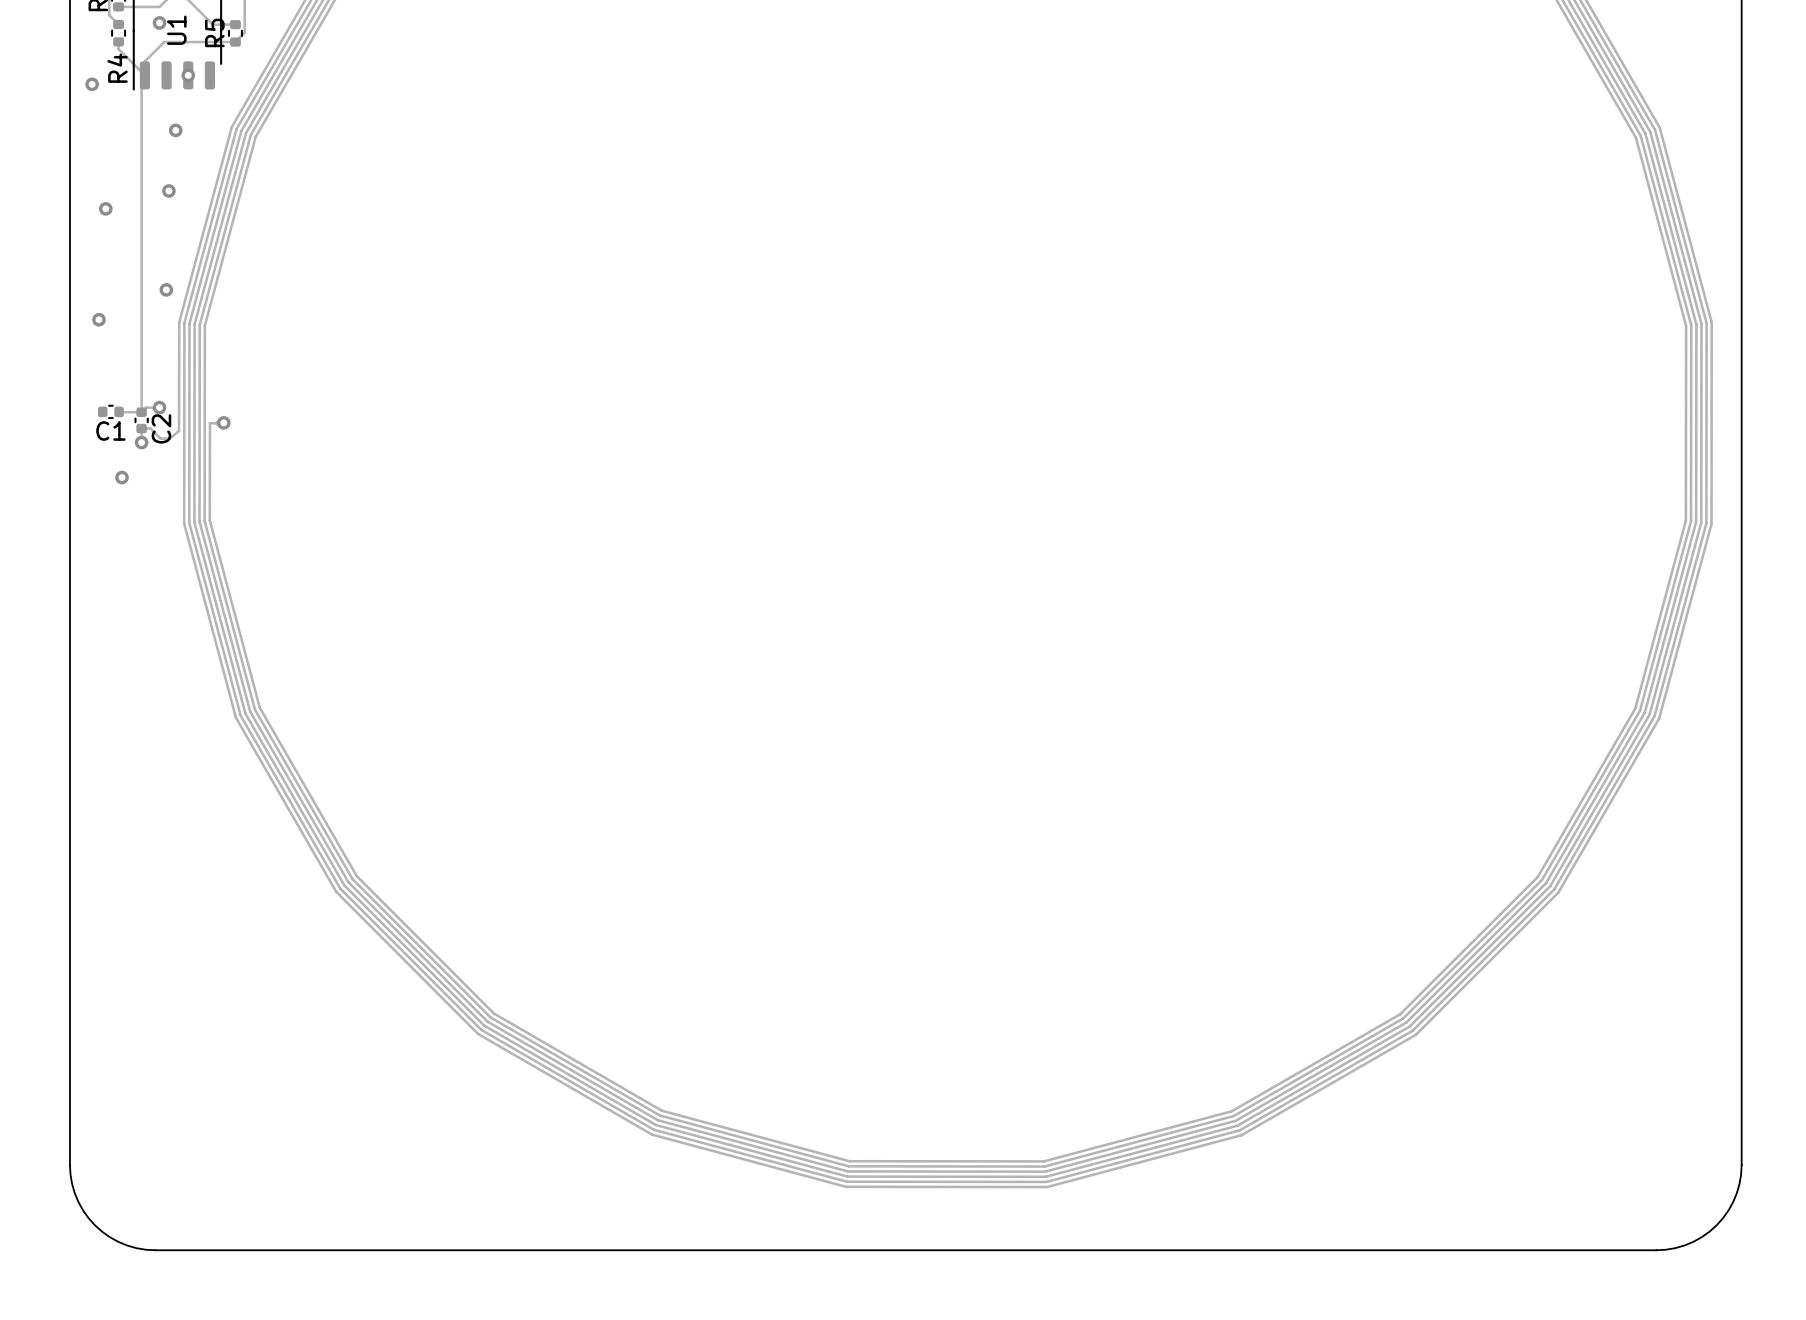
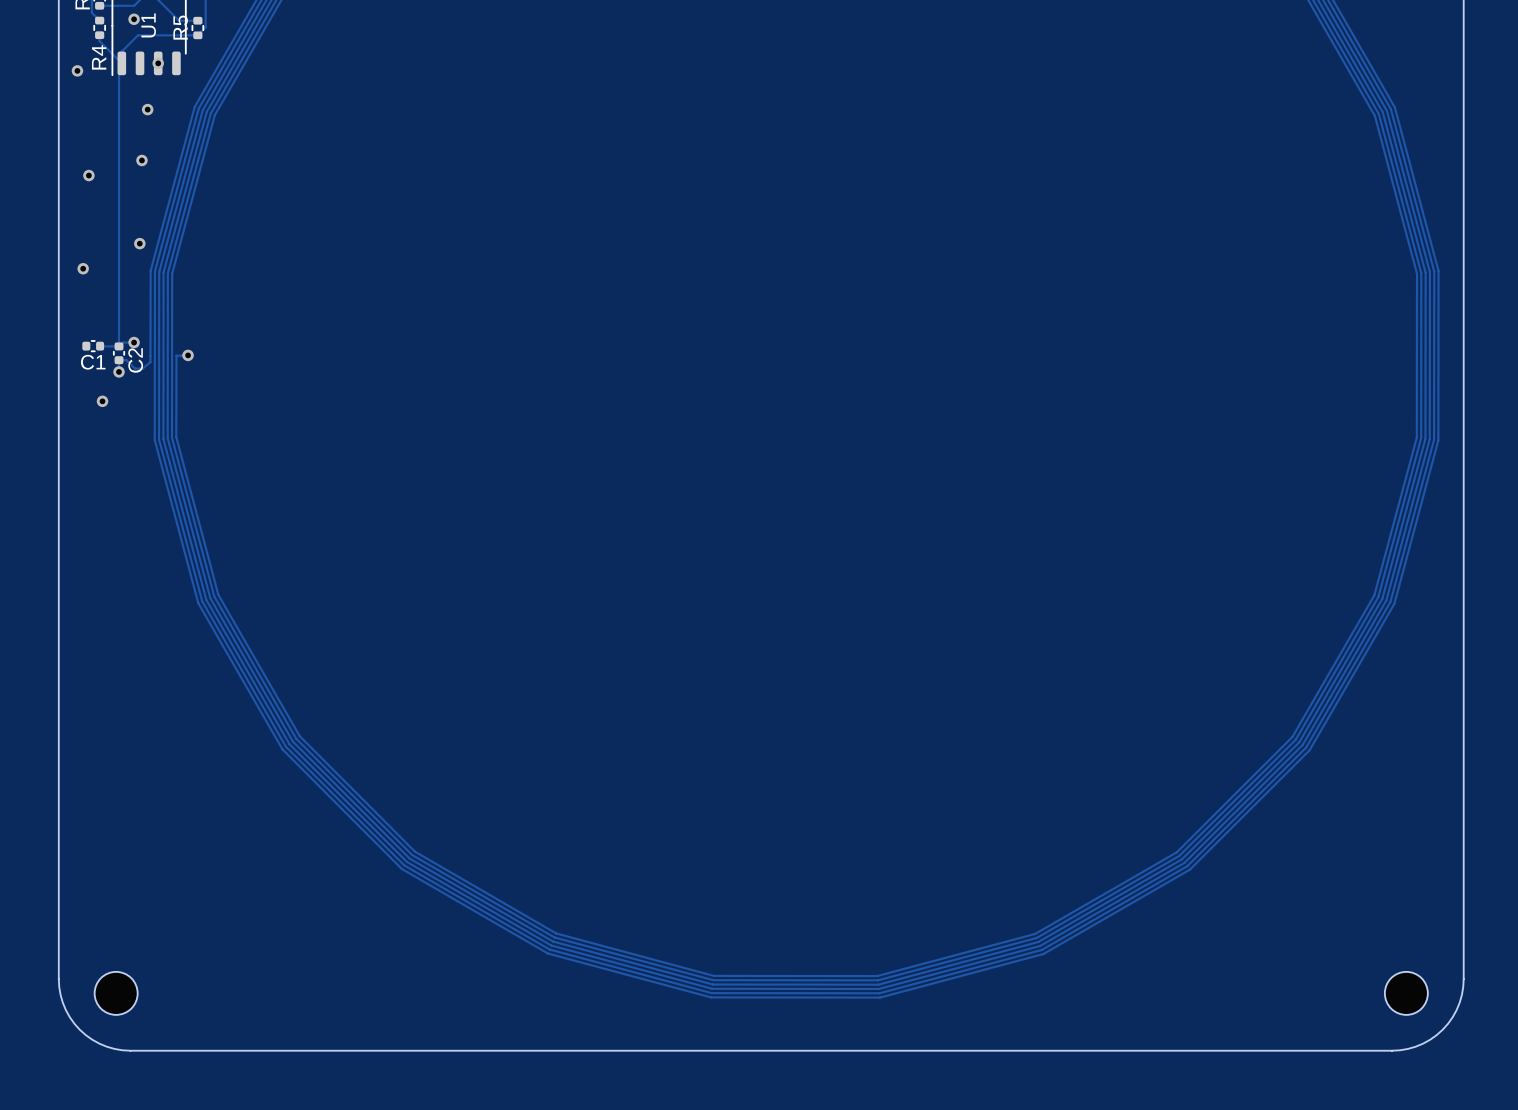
part: none -> (116, 993)
part: none -> (1406, 993)

